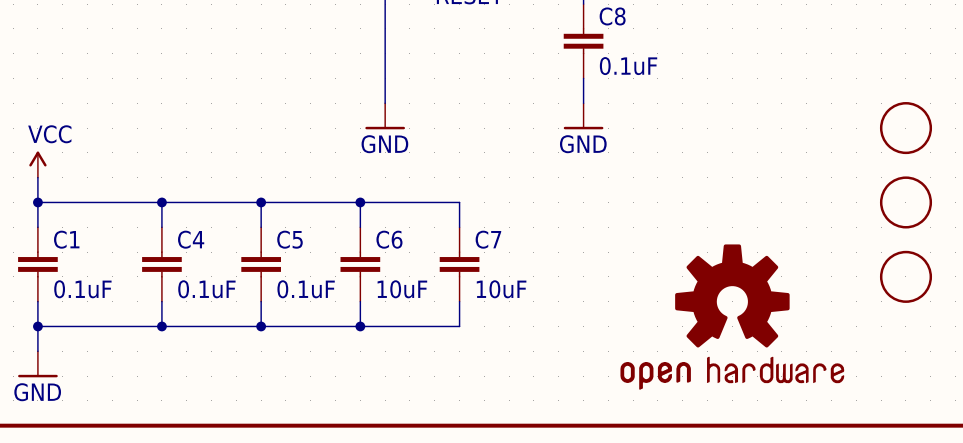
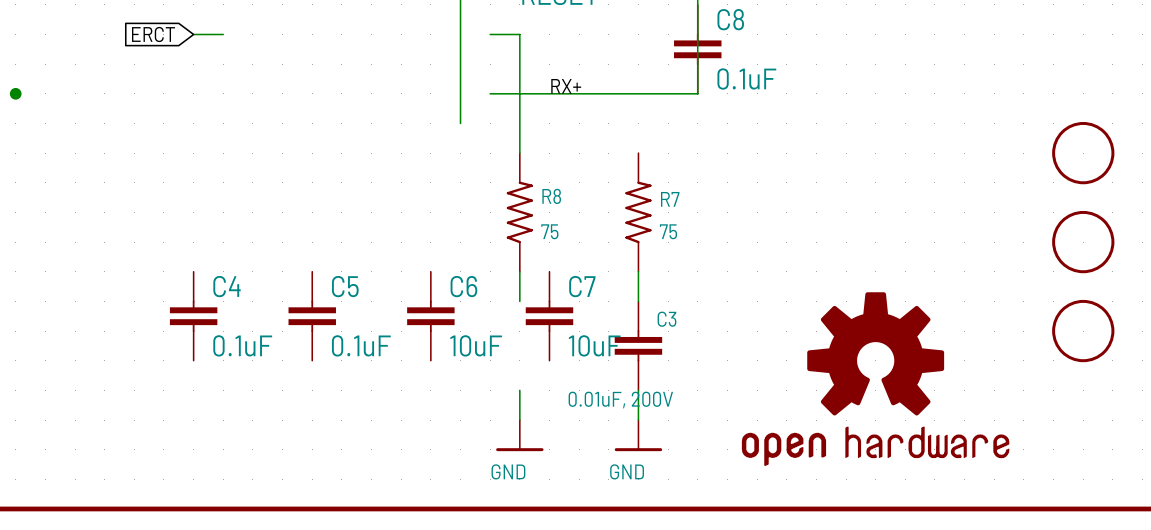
wire: none -> (697, 4) (697, 93) (490, 93)
global label: none -> ERCT (153, 34)
wire: none -> (193, 34) (223, 34)
wire: none -> (490, 34) (519, 34) (519, 153)
label: none -> RX+ (566, 86)
junction: none -> (15, 93)
wire: (583, 78) (583, 103) -> none
power symbol: GND (385, 116) -> none
power symbol: GND (583, 116) -> none
power symbol: VCC (37, 164) -> none
wire: (37, 177) (37, 227) -> none
R8: none -> 75 (519, 212)
R7: none -> 75 (638, 212)
wire: (37, 202) (459, 202) (459, 227) -> none
junction: (37, 202) -> none
wire: (161, 202) (161, 227) -> none
junction: (161, 202) -> none
wire: (261, 202) (261, 227) -> (519, 271) (519, 301)
junction: (261, 202) -> none
wire: (360, 202) (360, 227) -> (638, 271) (638, 301)
junction: (360, 202) -> none
C1: 0.1uF (37, 264) -> none
C3: none -> 0.01uF, 200V (638, 345)
wire: (37, 301) (37, 351) -> none
wire: (161, 301) (161, 326) -> none
wire: (261, 301) (261, 326) -> (519, 390) (519, 420)
wire: (360, 301) (360, 326) -> (638, 390) (638, 420)
wire: (459, 301) (459, 326) (37, 326) -> none
junction: (37, 326) -> none
junction: (161, 326) -> none
junction: (261, 326) -> none
junction: (360, 326) -> none
power symbol: GND (37, 364) -> none
power symbol: none -> GND (519, 435)
power symbol: none -> GND (638, 435)

